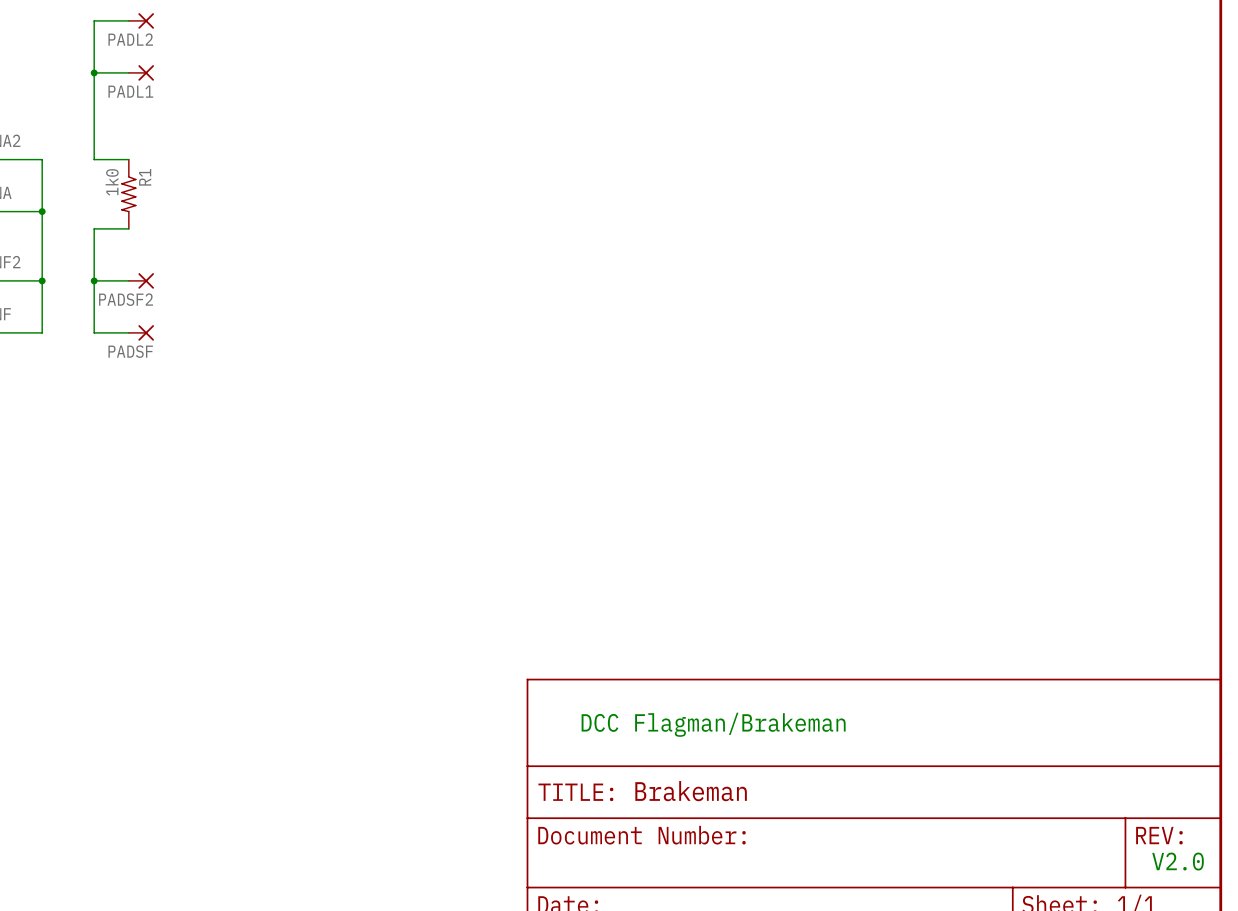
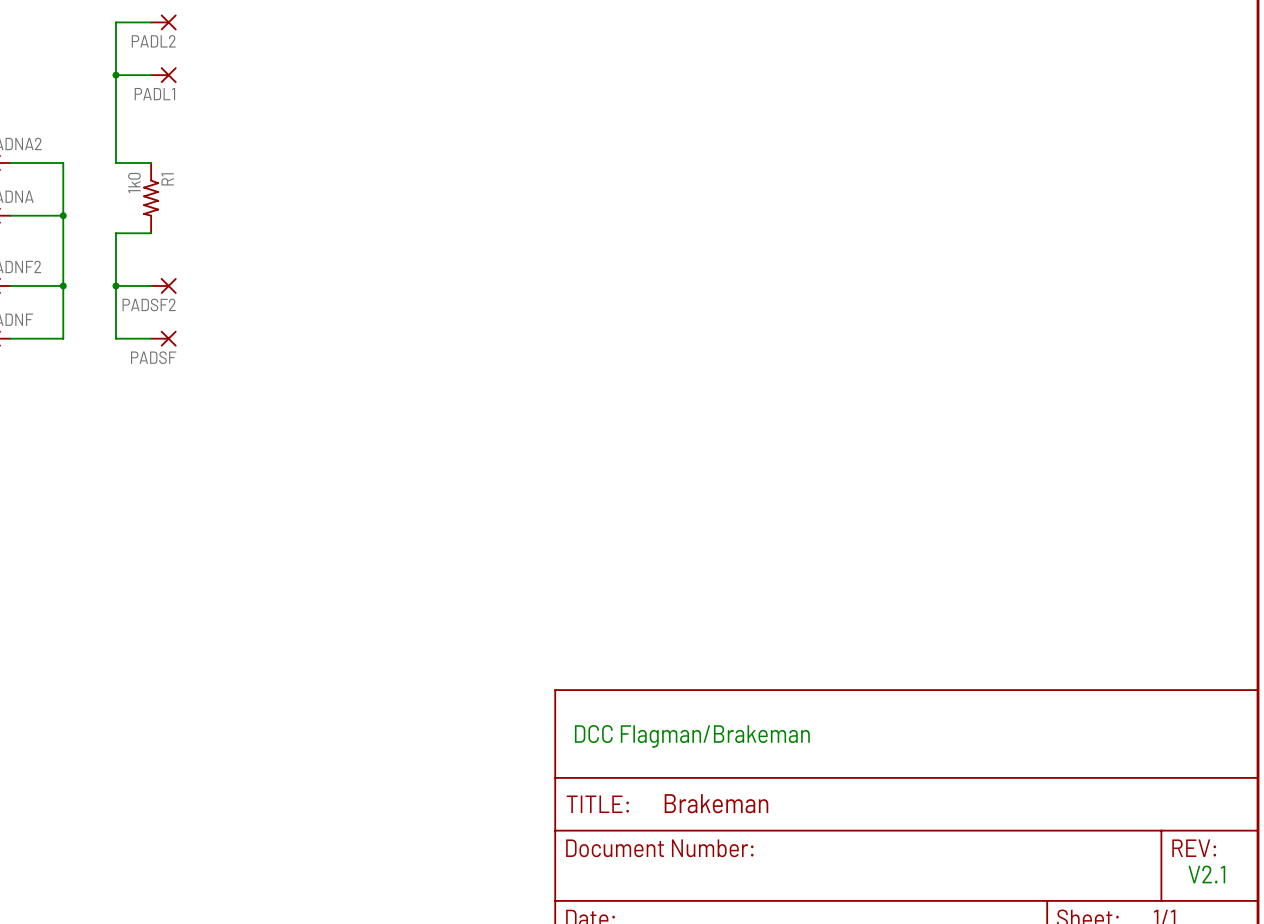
text position: DCC Flagman/Brakeman (713, 724) -> DCC Flagman/Brakeman (692, 736)
text: V2.0 (1178, 861) -> V2.1 (1206, 874)

